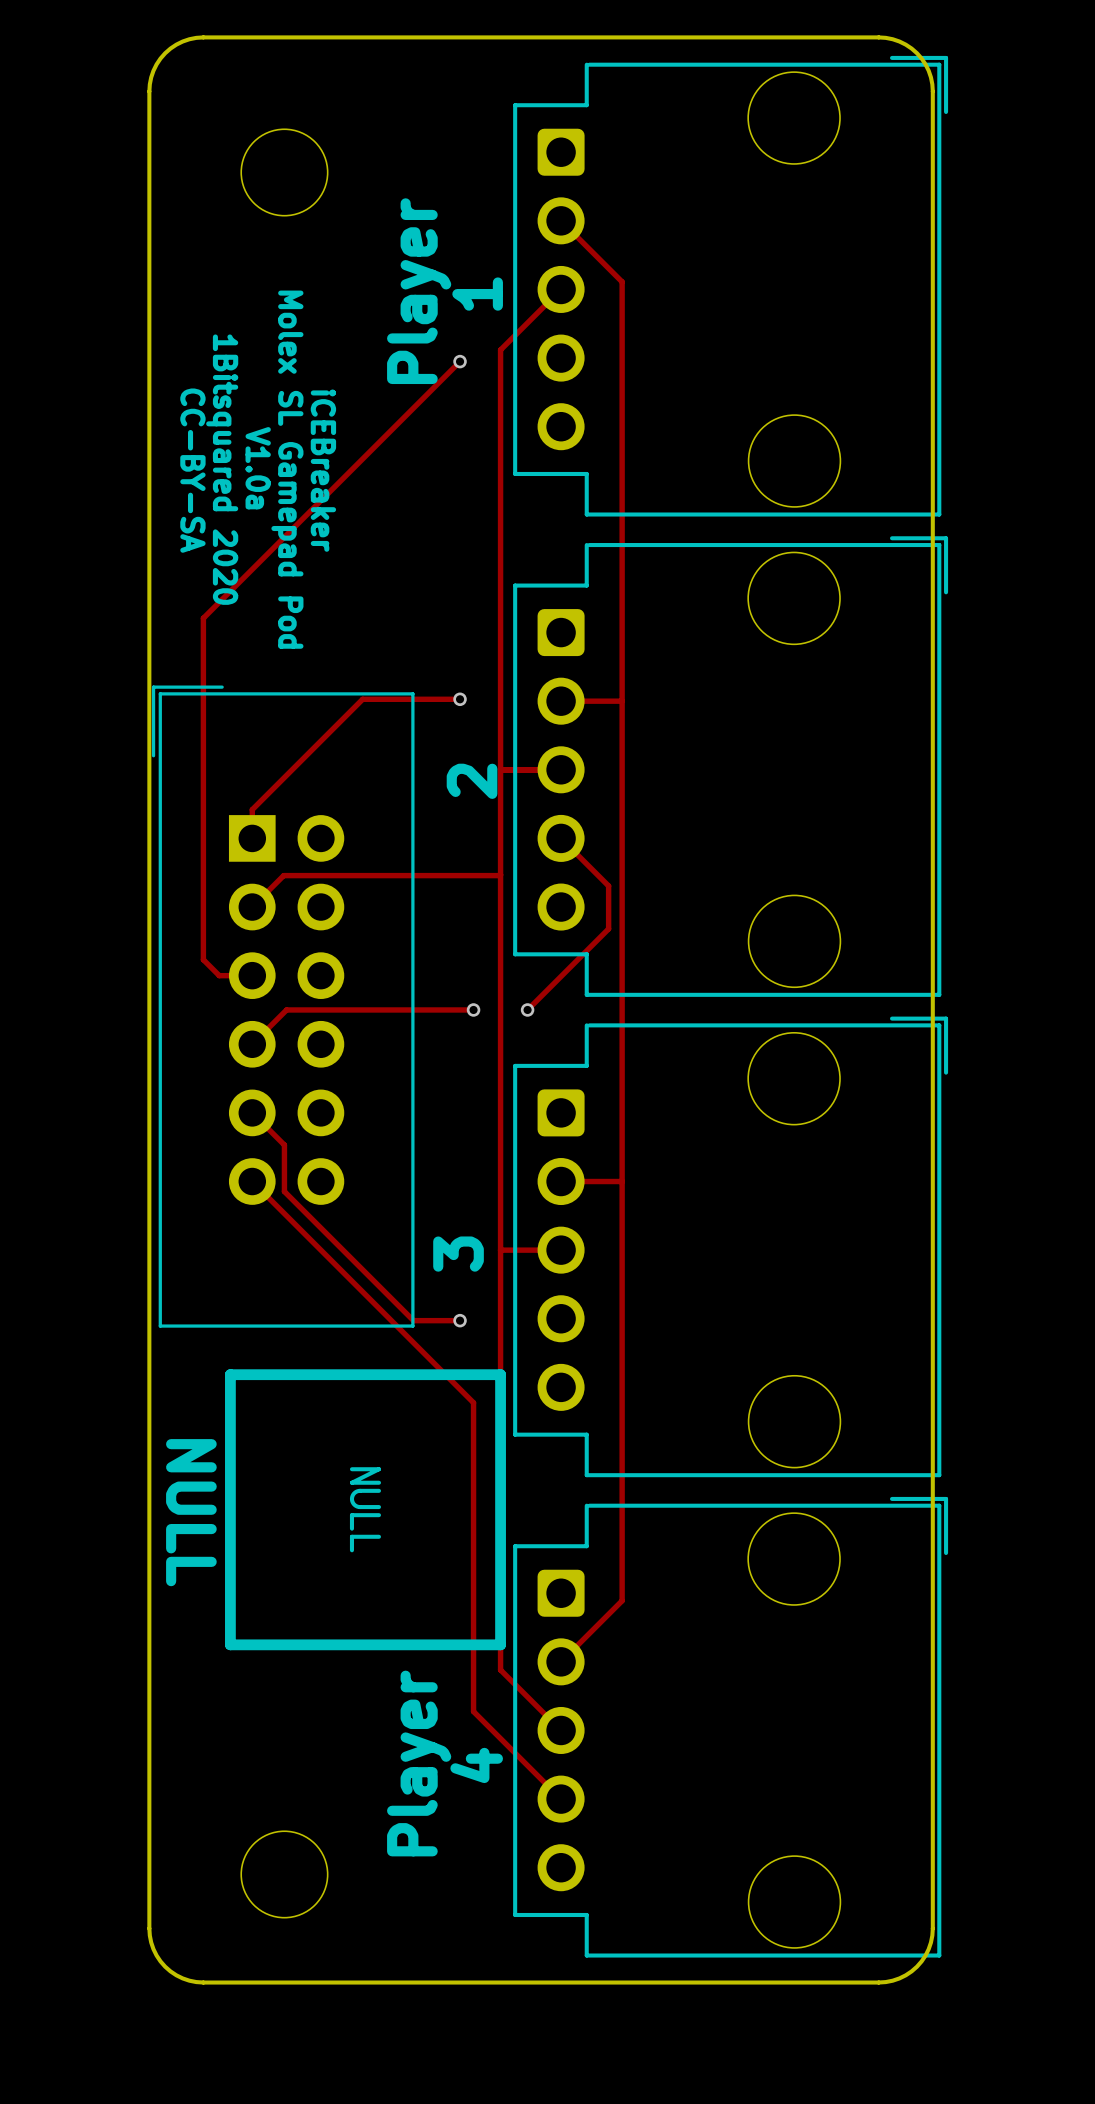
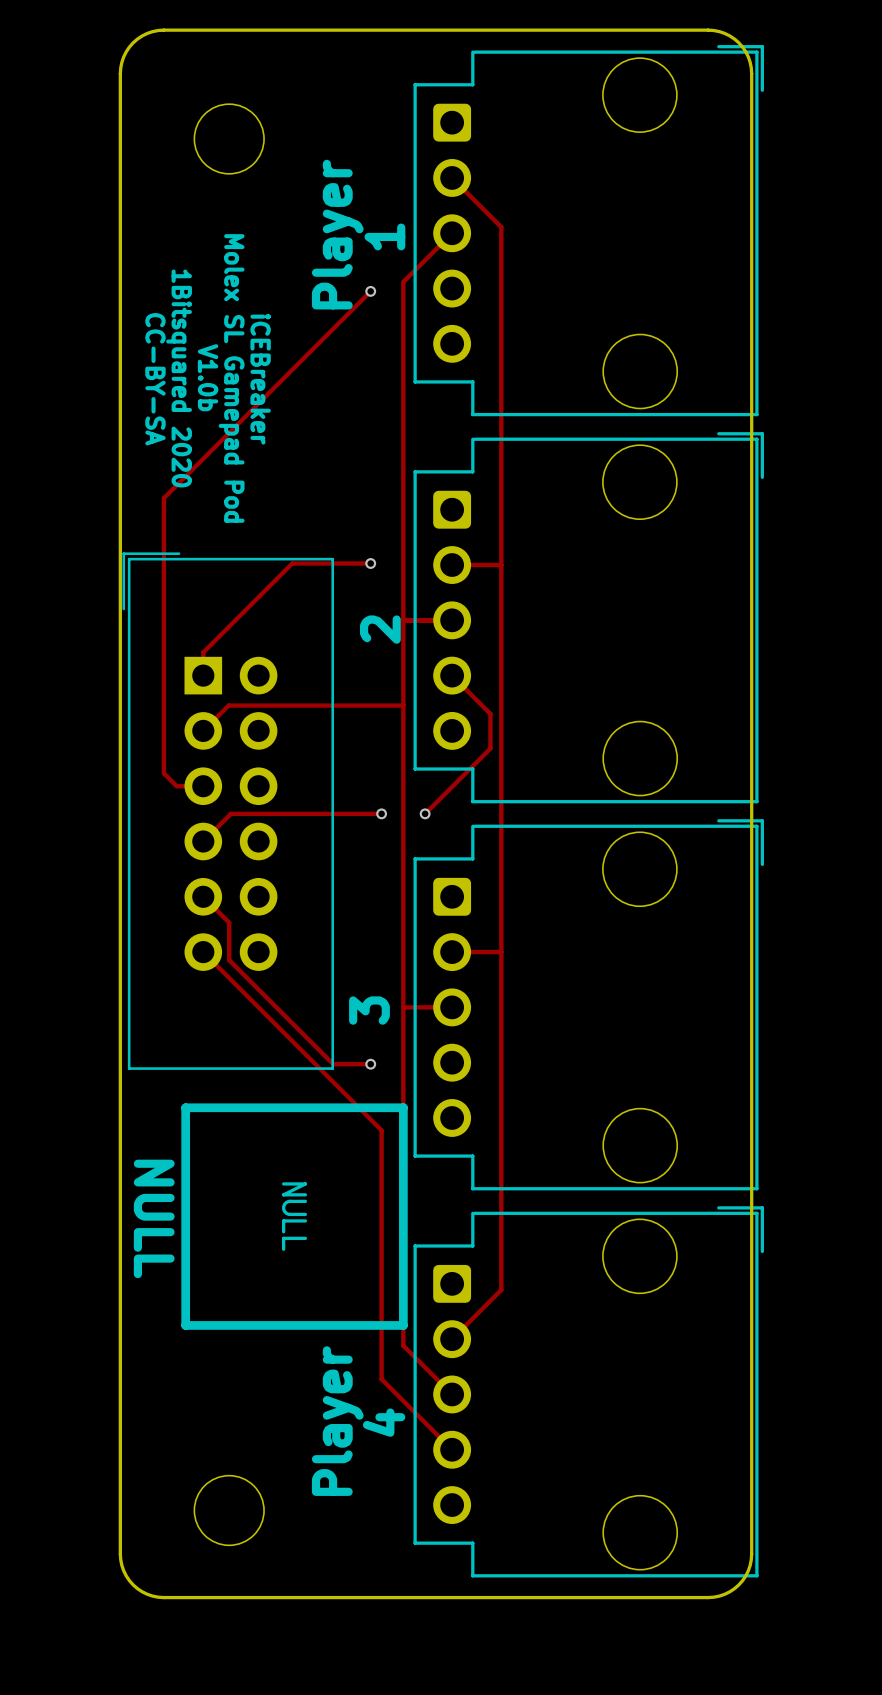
text: V1.0a (258, 468) -> V1.0b (208, 377)

